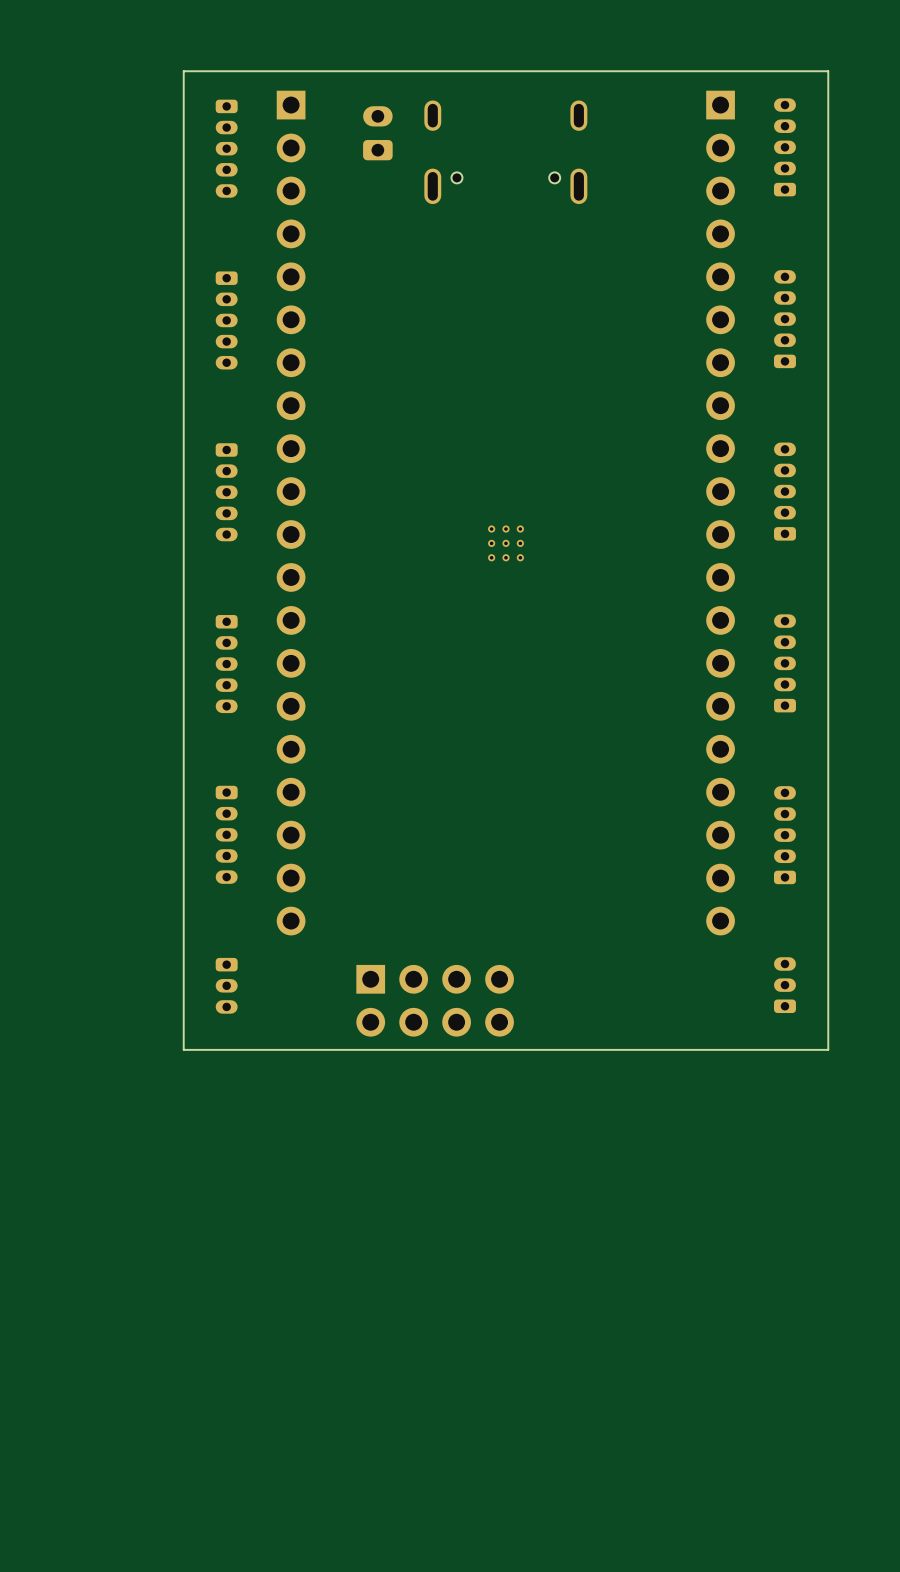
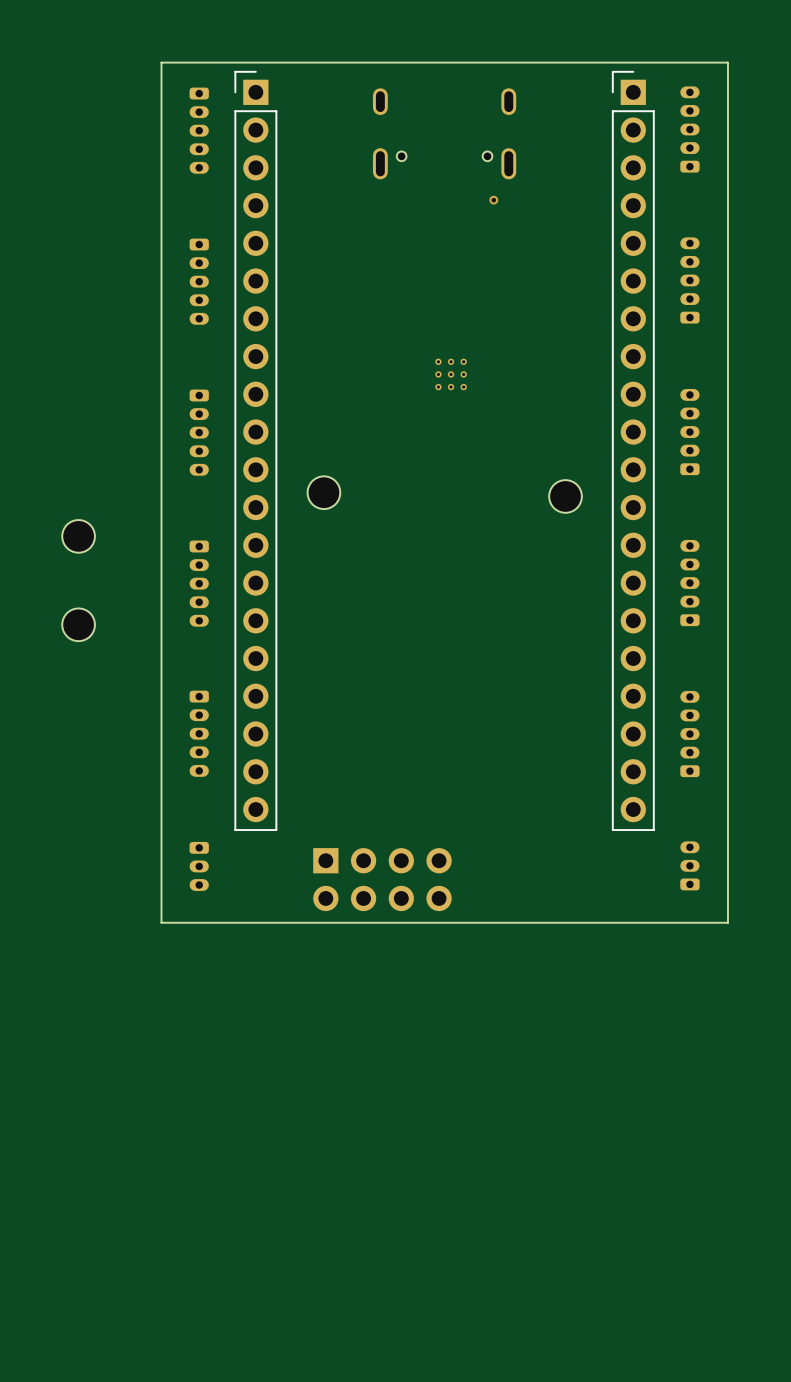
part: (377, 133) -> none
via: none -> (493, 200)
part side: top (291, 513) -> bottom (255, 450)
part side: top (720, 513) -> bottom (633, 450)
part position: (506, 543) -> (451, 374)
part: none -> (323, 492)
part: none -> (565, 496)
part: none -> (78, 536)
part: none -> (78, 624)

